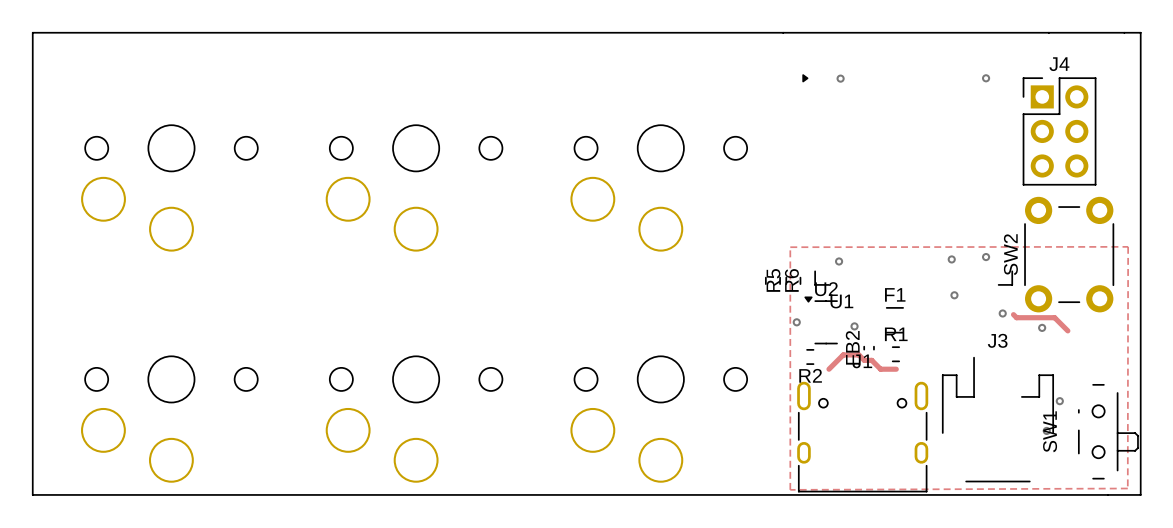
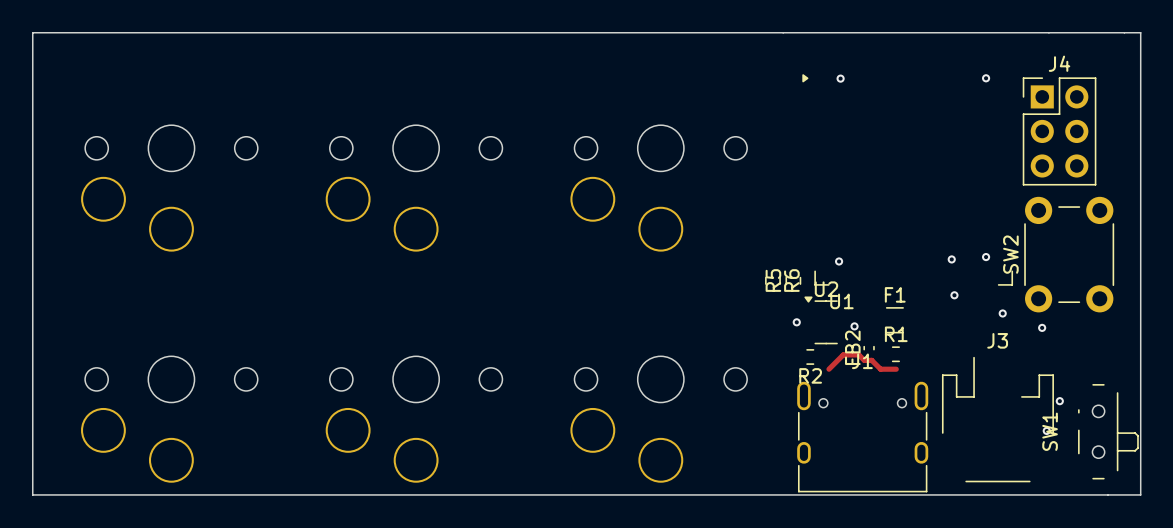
zone outline: (1128, 246) (790, 247) (790, 489) (1127, 488) (1128, 246) -> none
track: (1013, 314) (1016, 317) (1054, 317) (1067, 330) -> none

